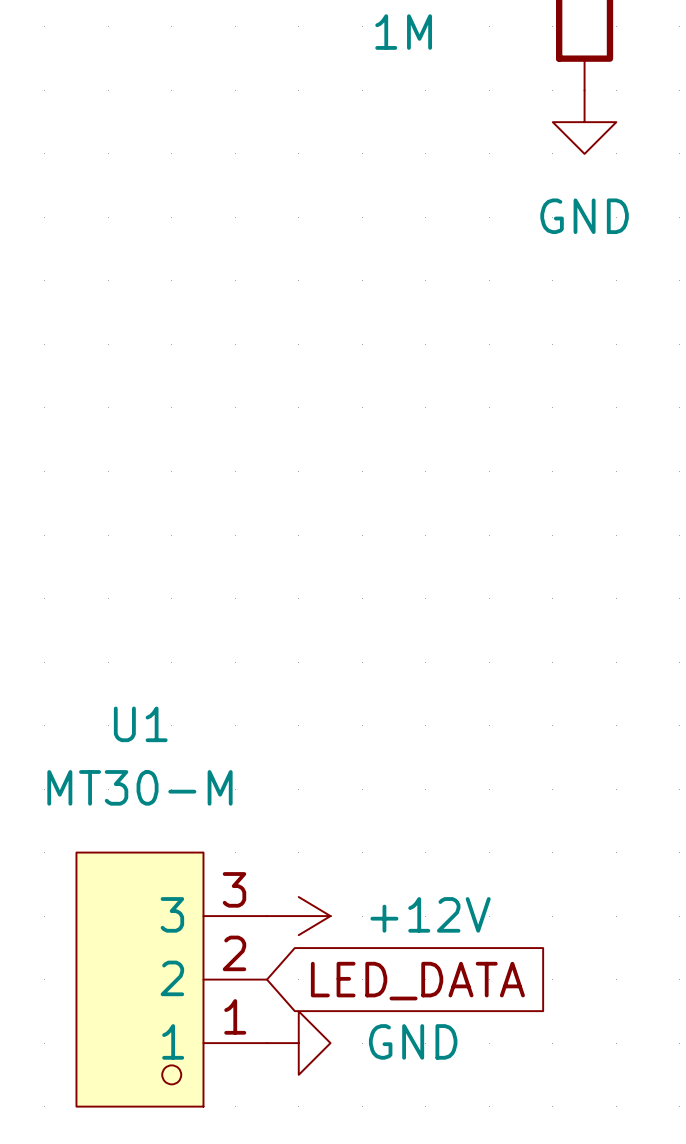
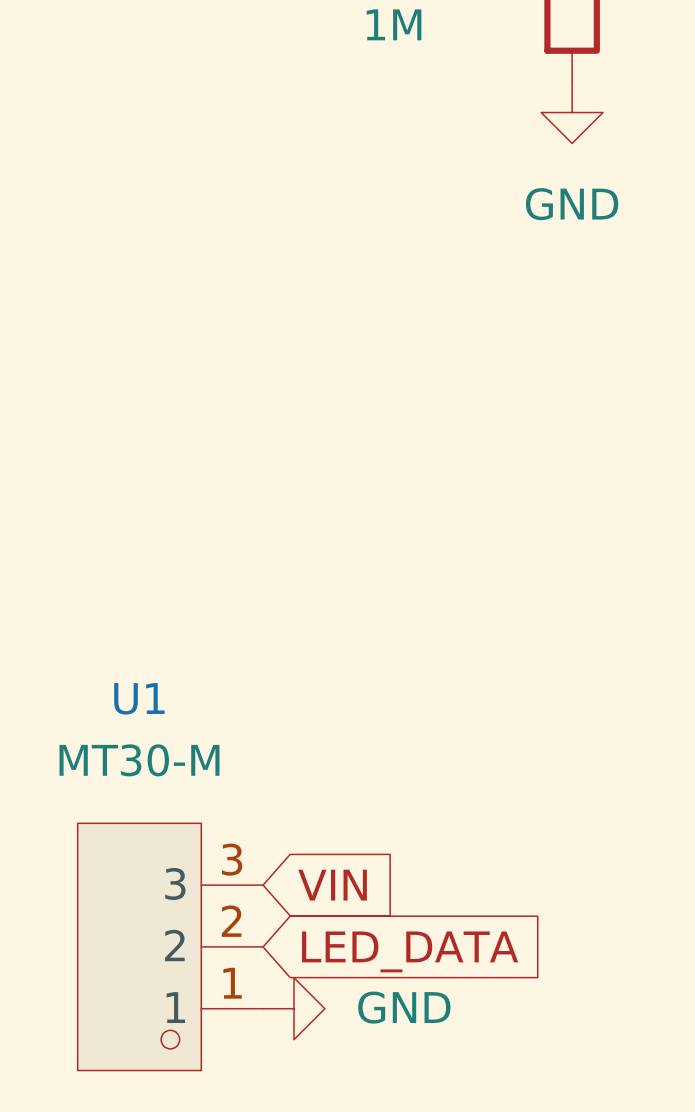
power symbol: +12V (298, 916) -> none
global label: none -> VIN (332, 885)

